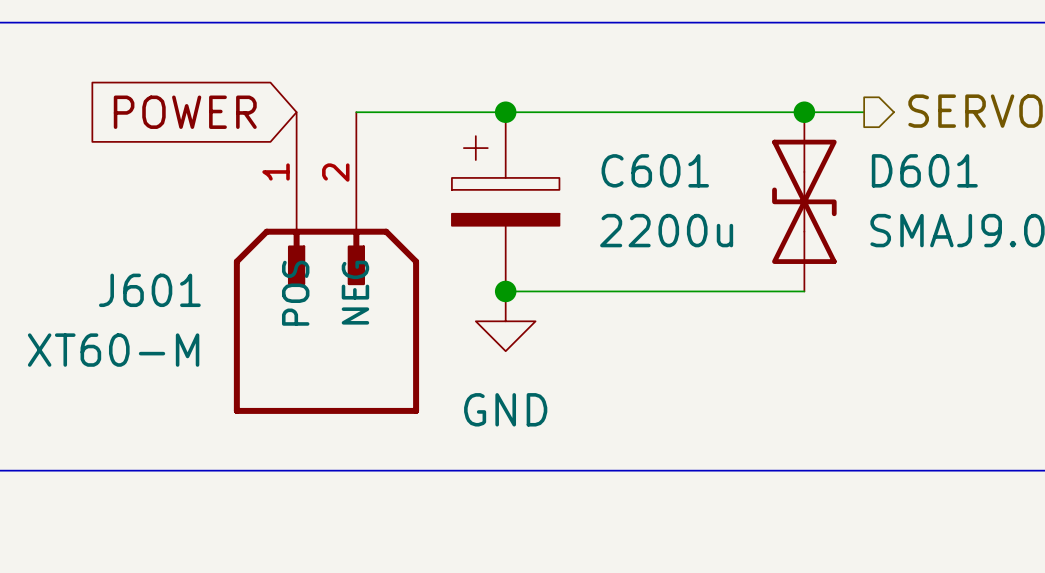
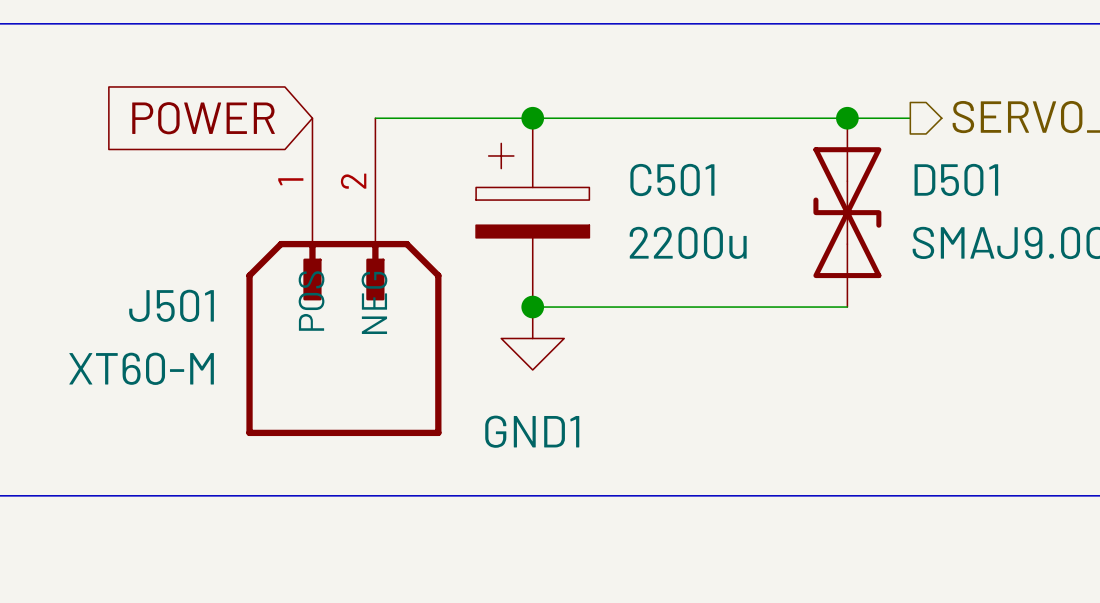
C601 name: C601 (655, 170) -> C501 (672, 180)
D601 name: D601 (924, 170) -> D501 (956, 180)
J601 name: J601 (149, 290) -> J501 (171, 305)
power symbol: GND (505, 321) -> GND1 (532, 338)

